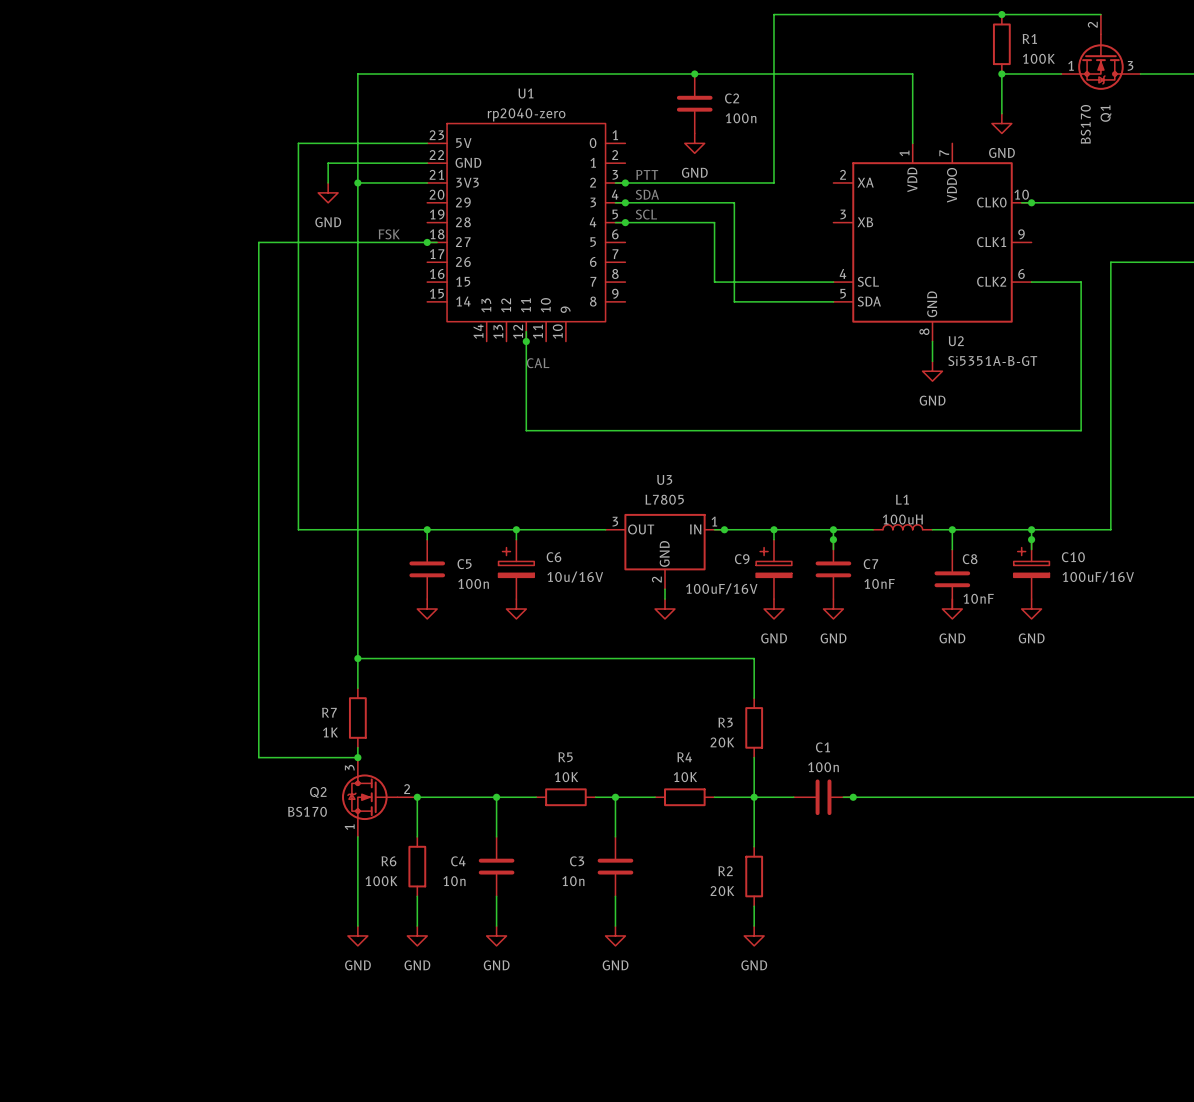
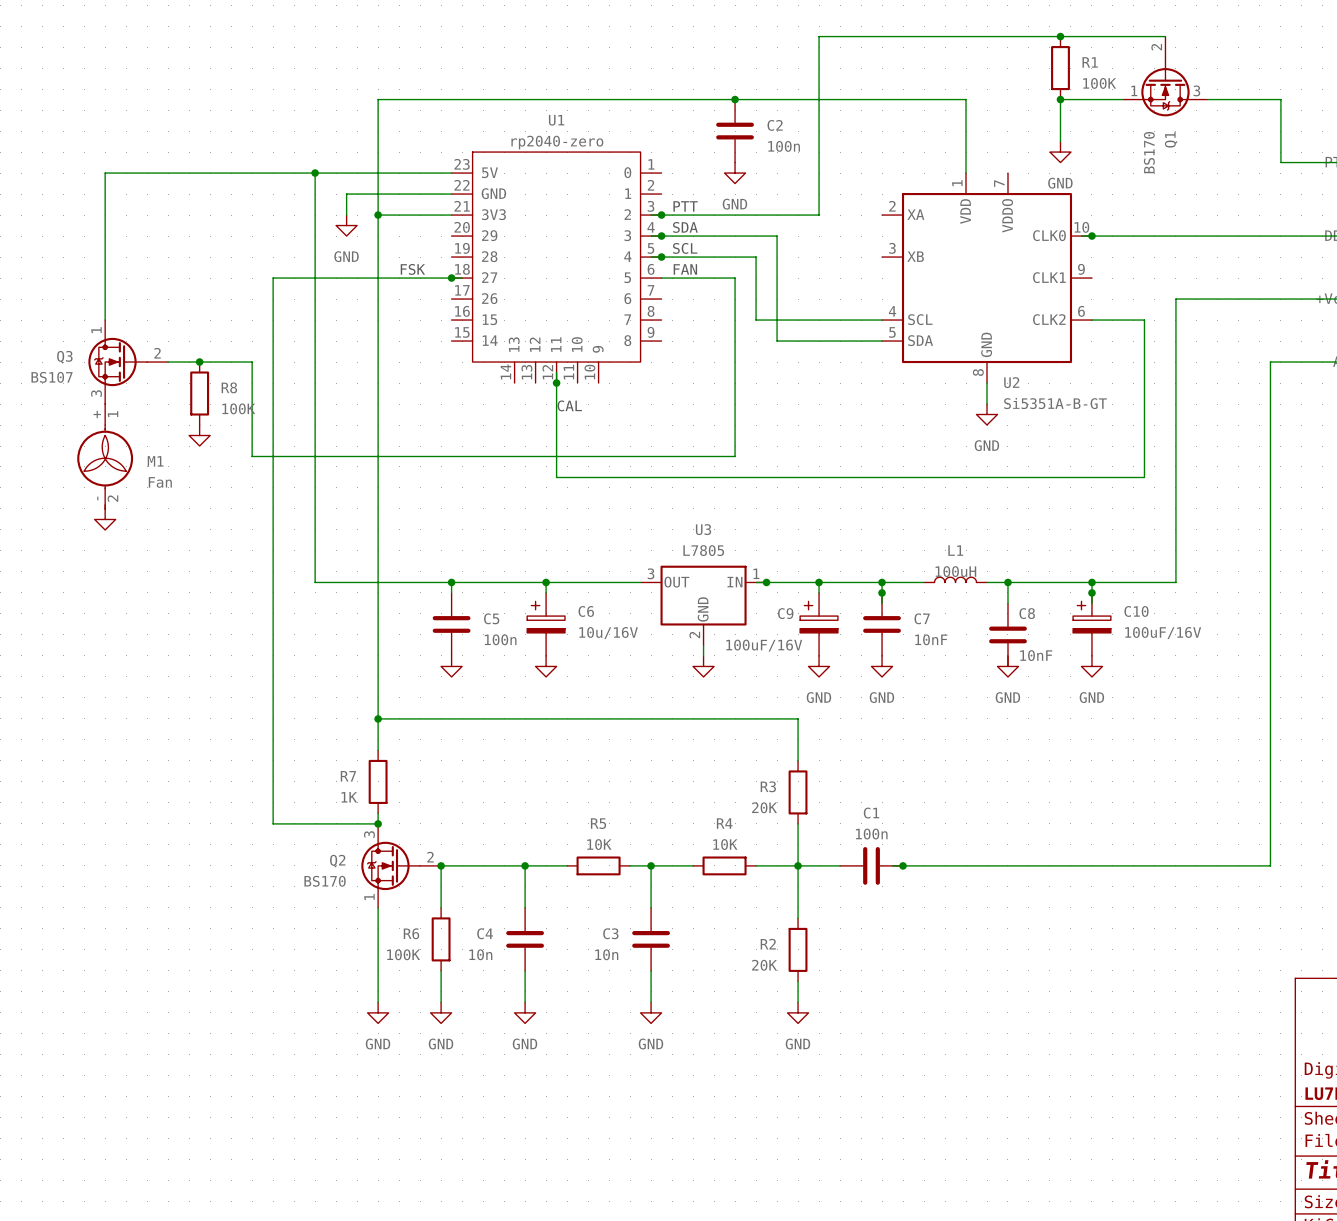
wire: none -> (315, 173) (105, 173) (105, 320)
junction: none -> (315, 173)
text: none -> FAN (685, 269)
wire: none -> (661, 278) (735, 278) (735, 456) (252, 456) (252, 362) (168, 362)
Q3: none -> BS107 (128, 362)
junction: none -> (199, 362)
R8: none -> 100K (199, 393)
power symbol: none -> (199, 435)
M1: none -> Fan (105, 456)
power symbol: none -> (105, 519)

